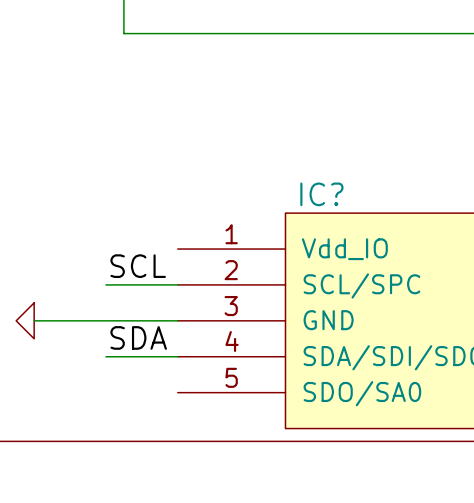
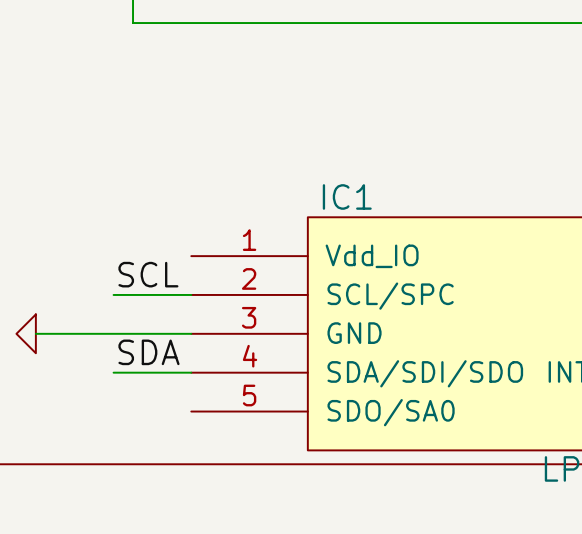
IC? name: IC? (321, 194) -> IC1 (347, 196)

